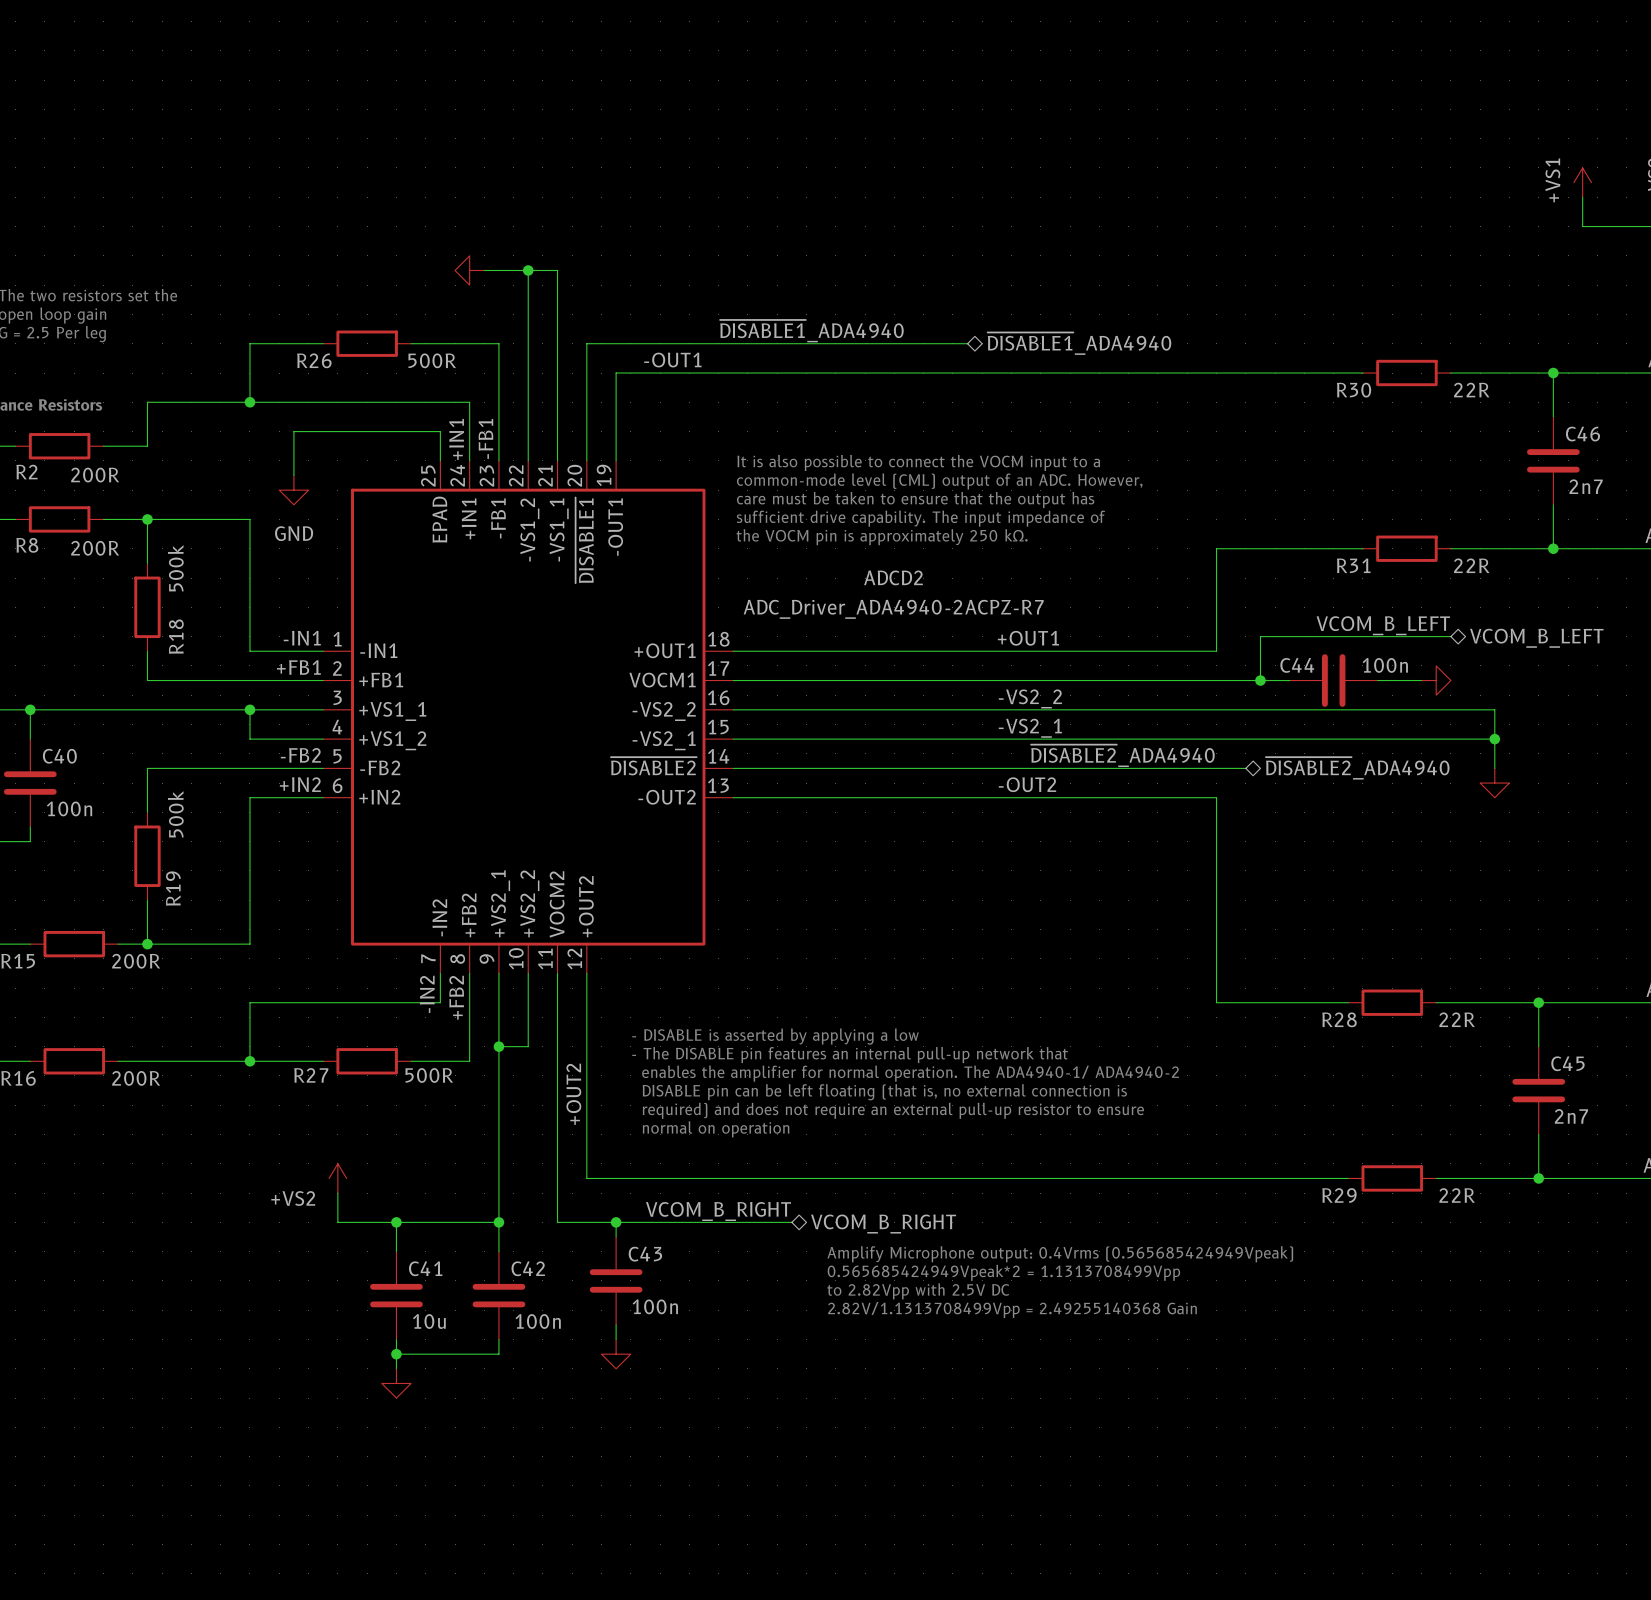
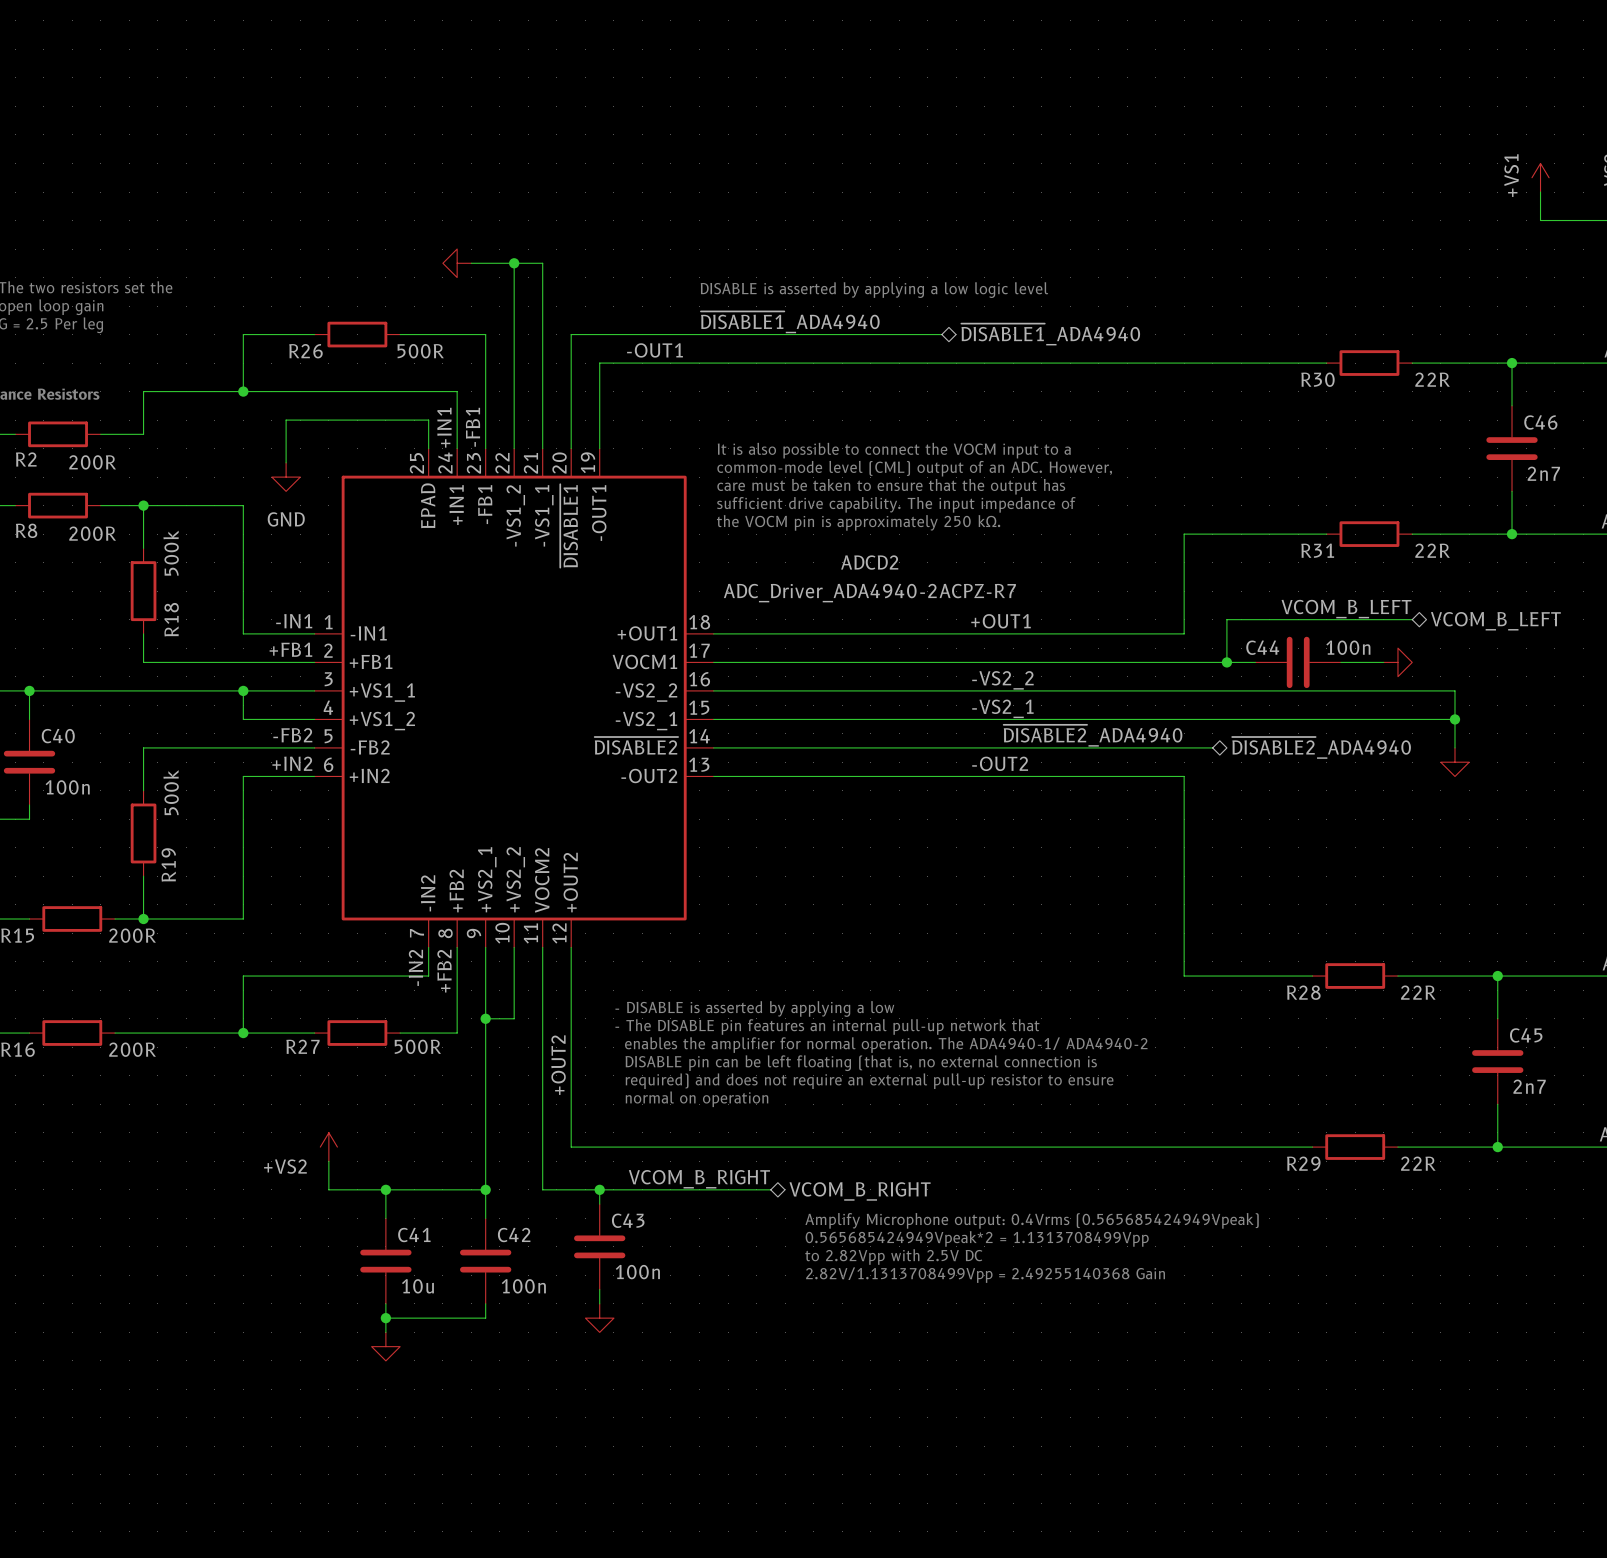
text: none -> DISABLE is asserted by applying a low logic level (874, 290)

